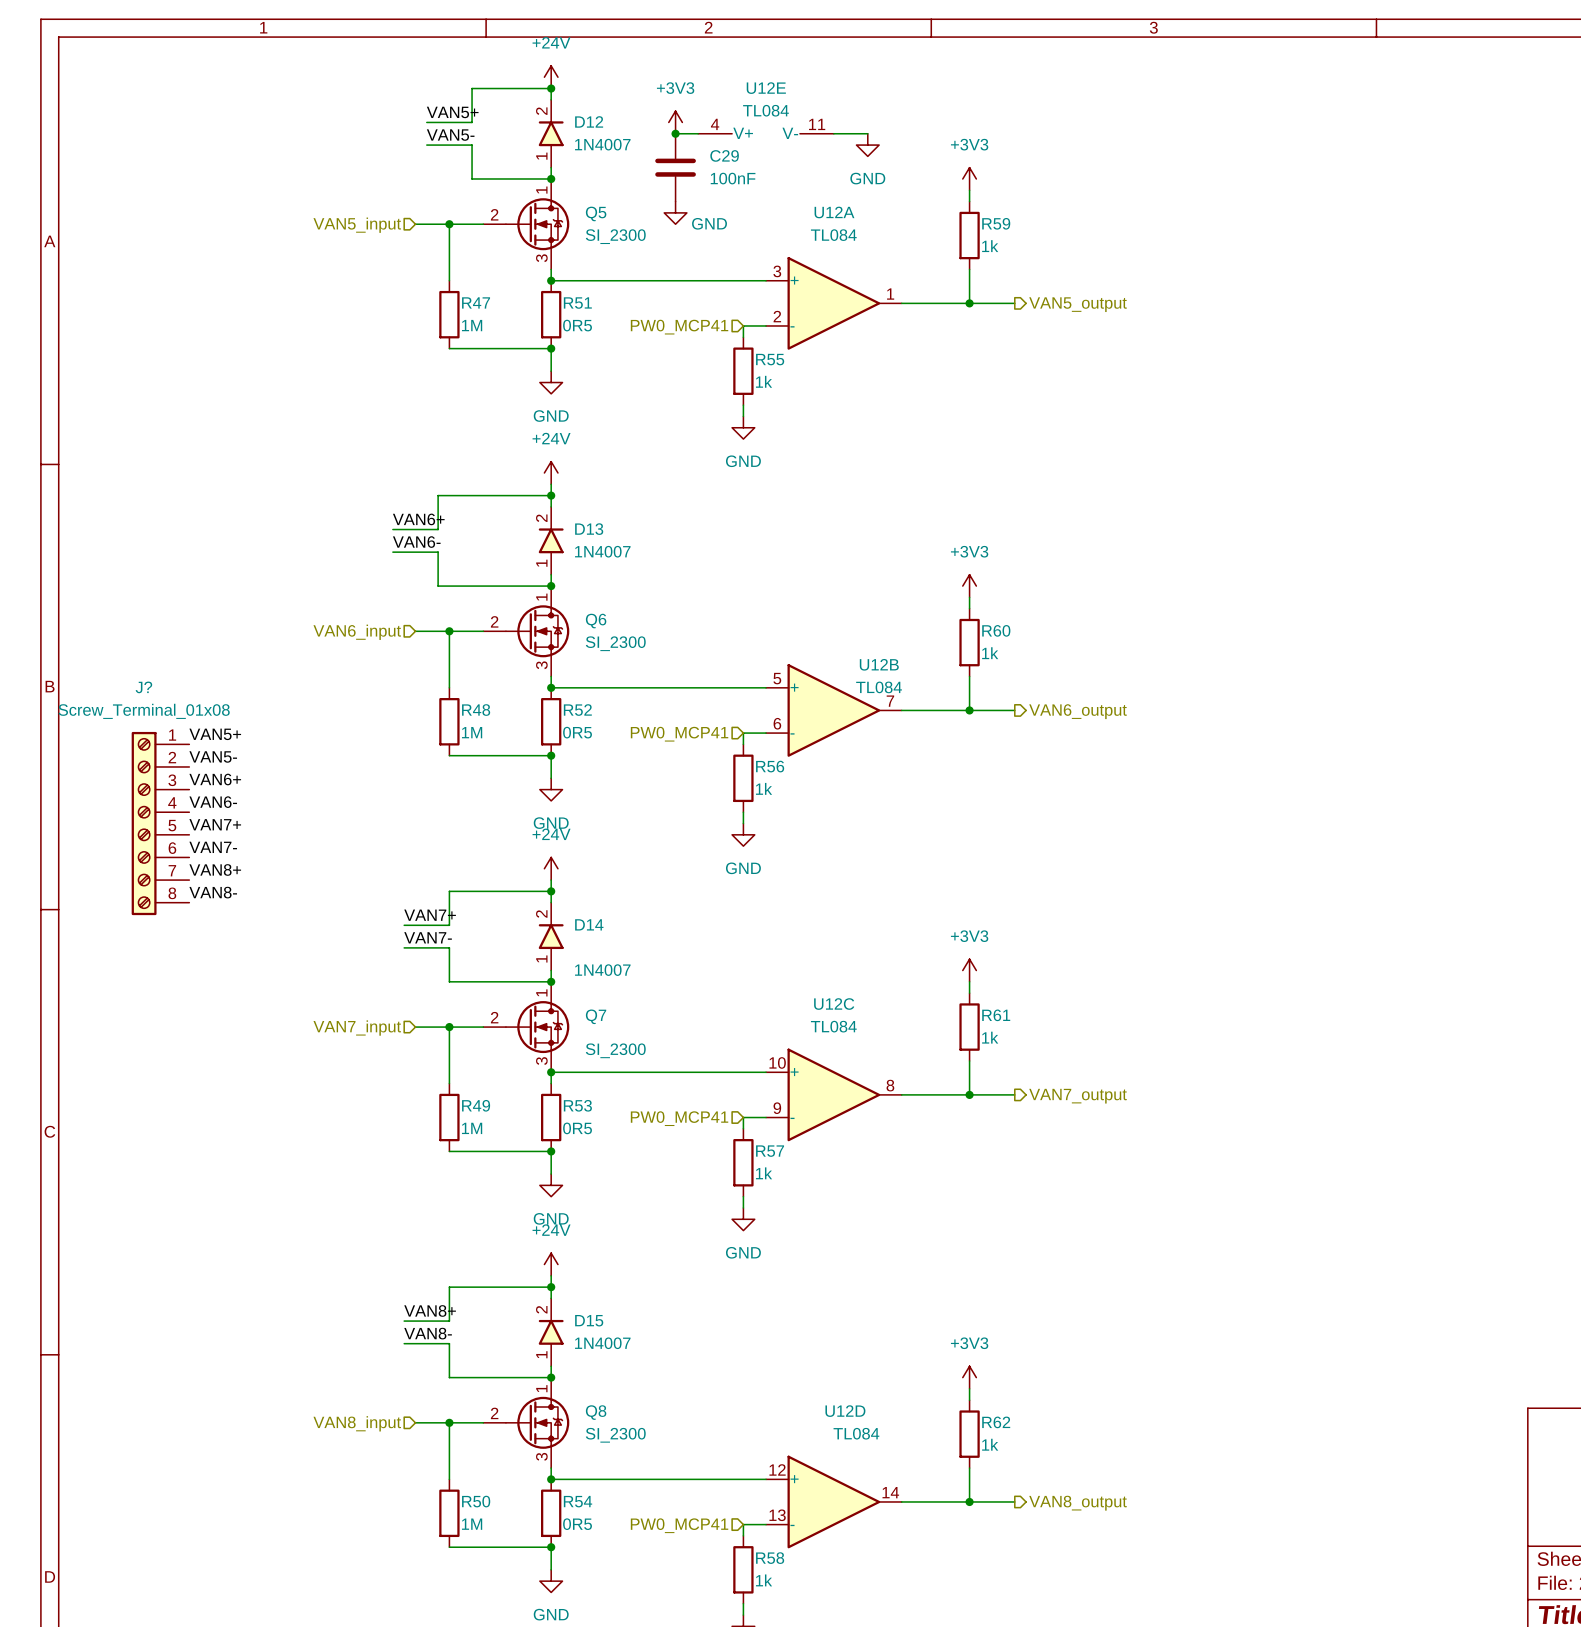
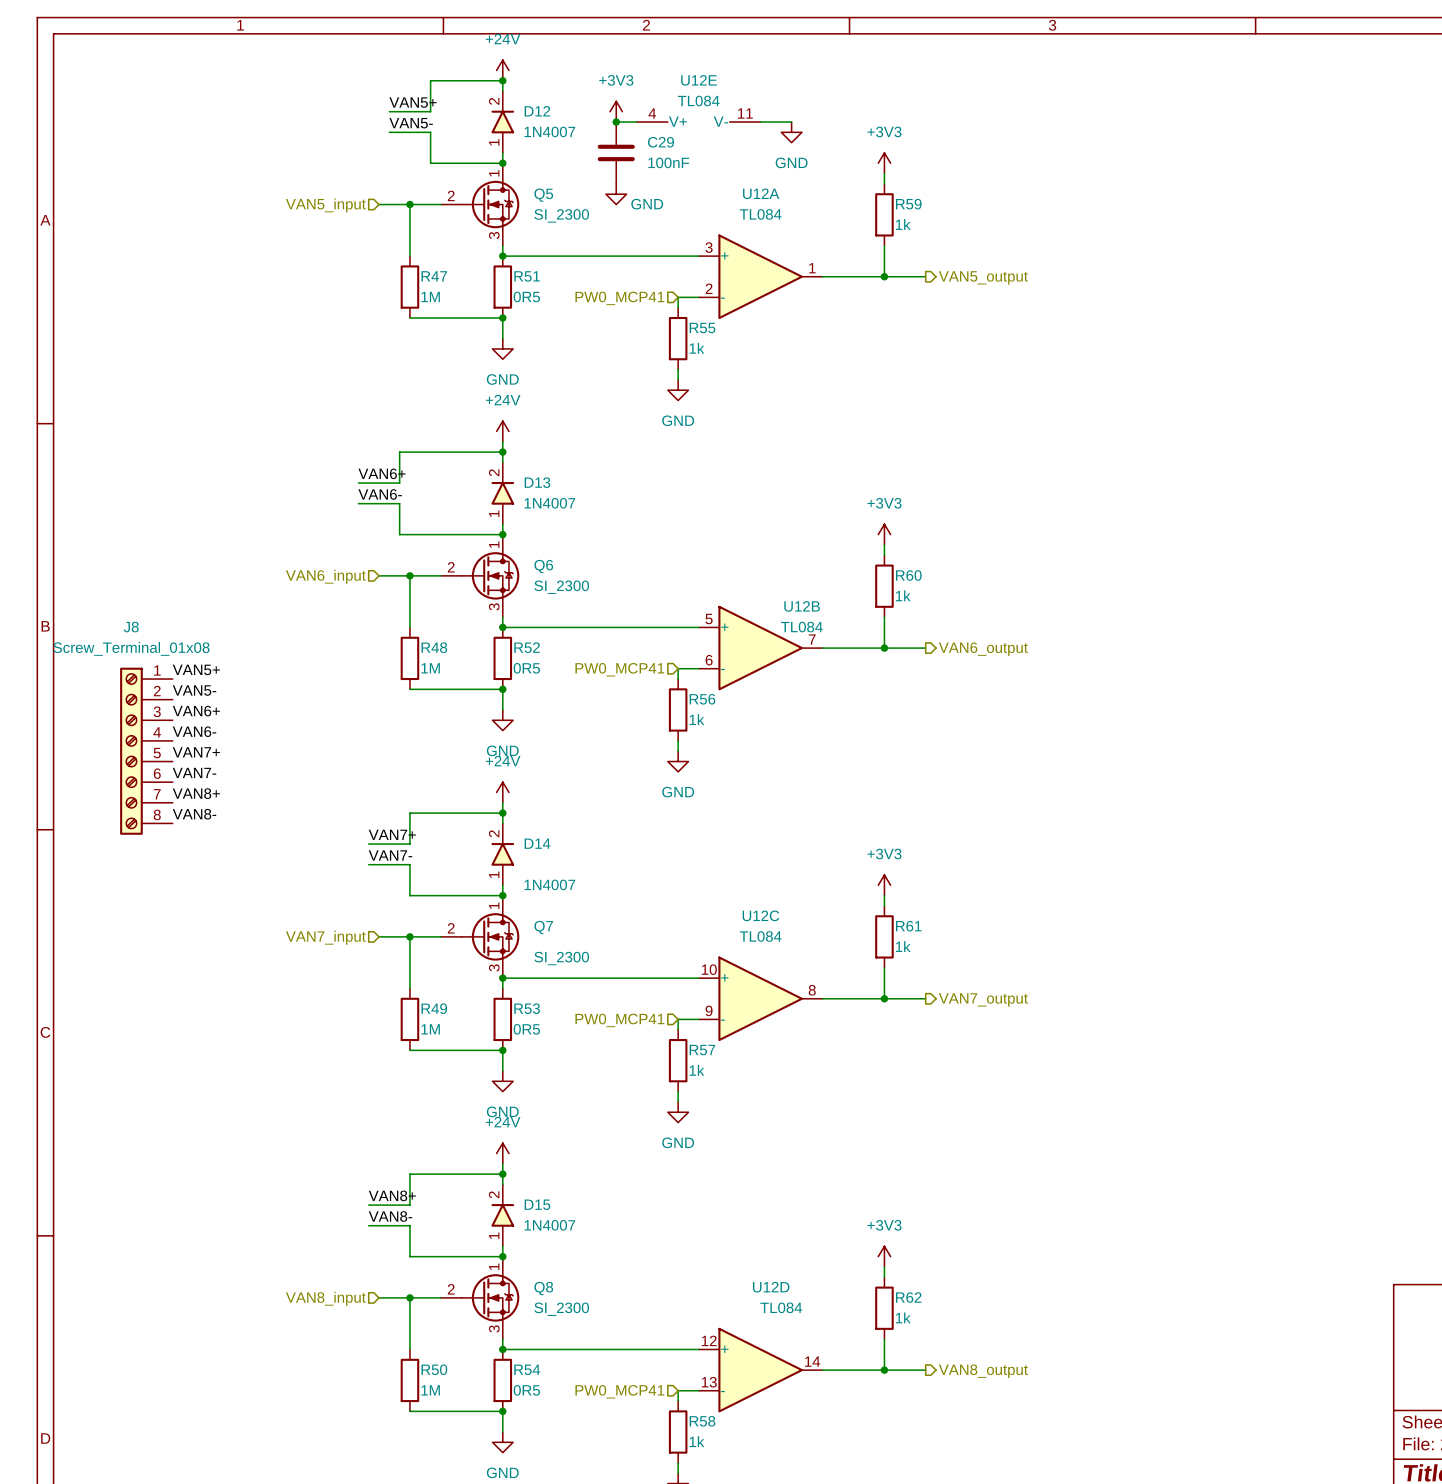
J? name: J? (143, 687) -> J8 (131, 627)

